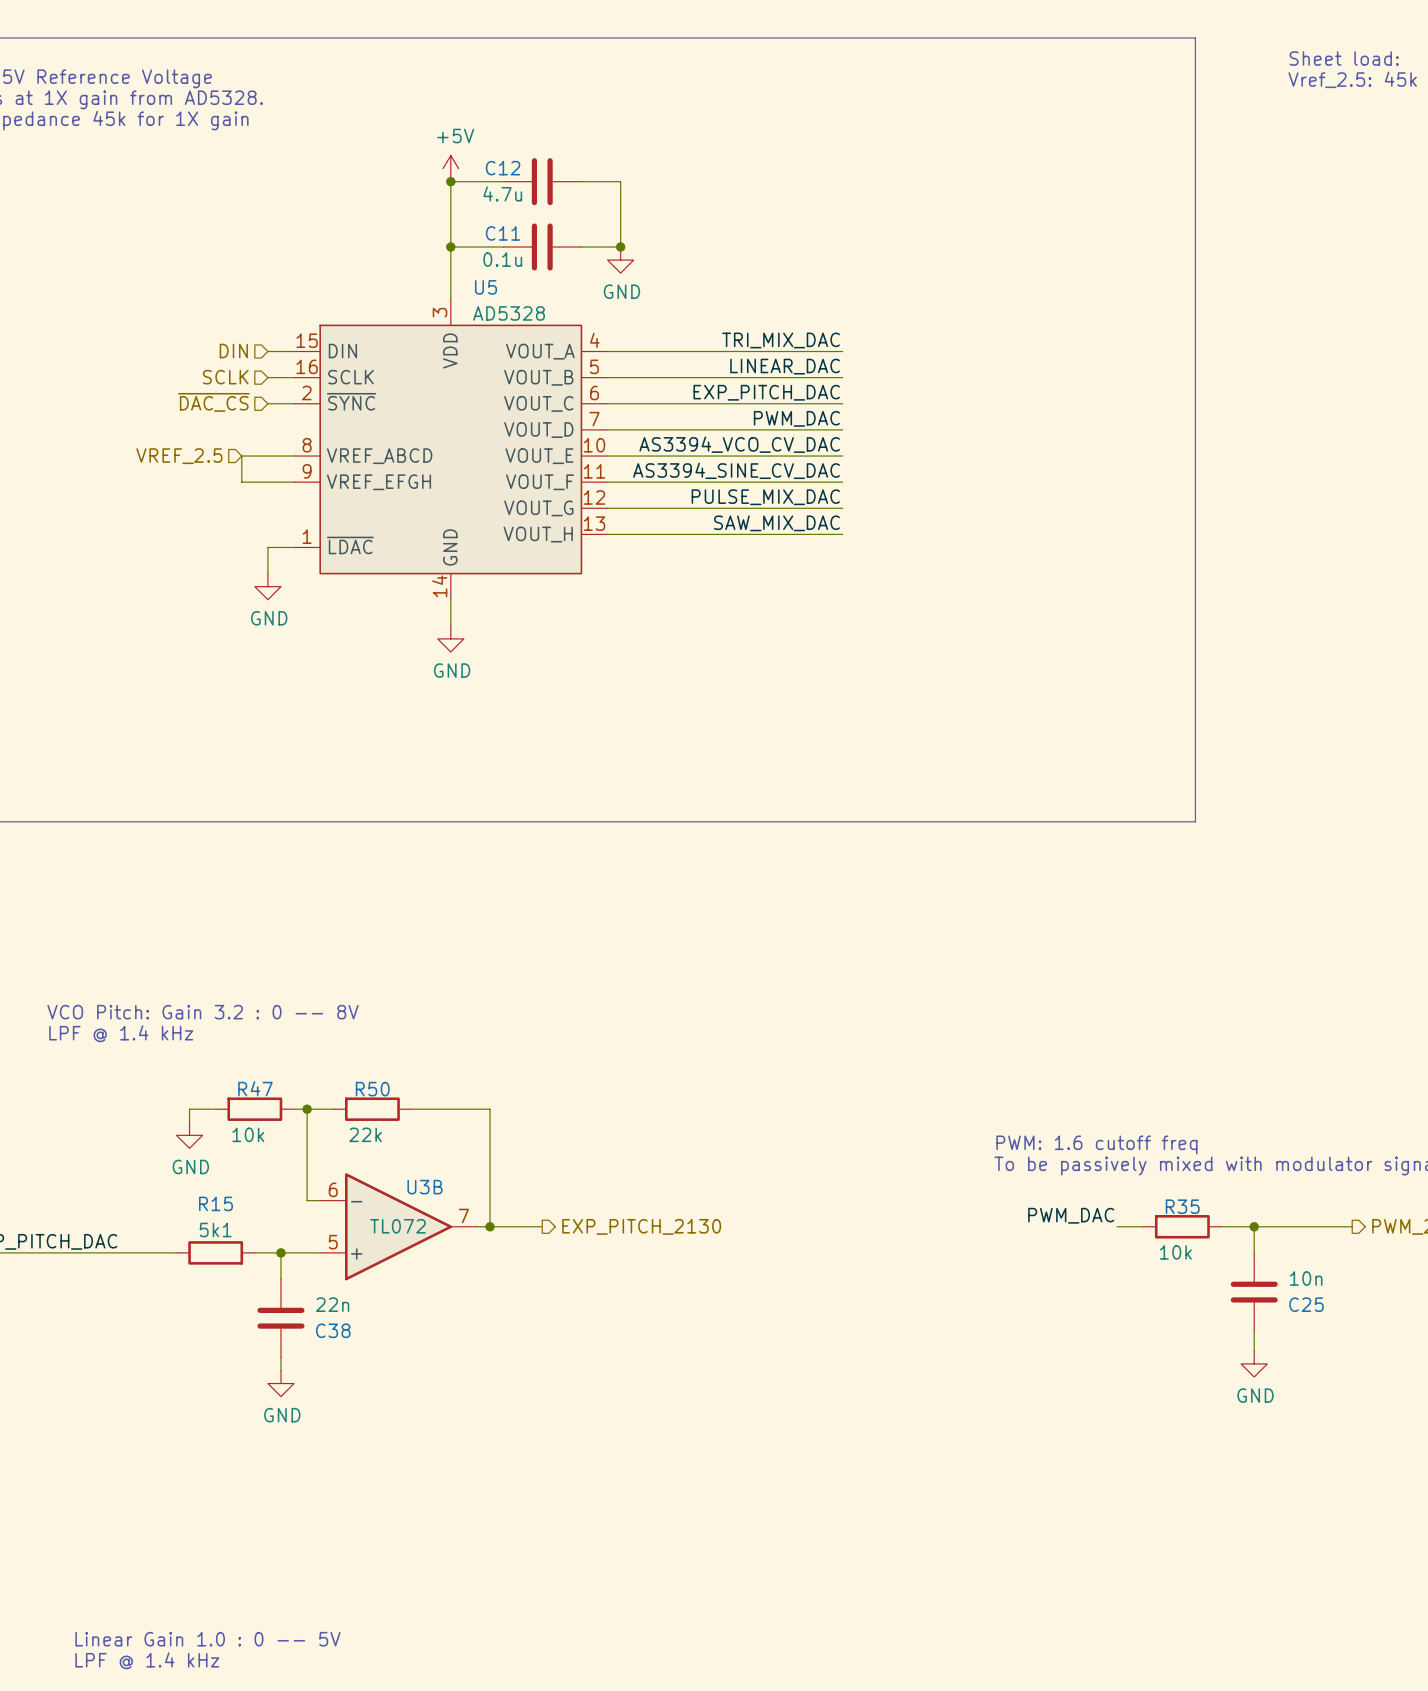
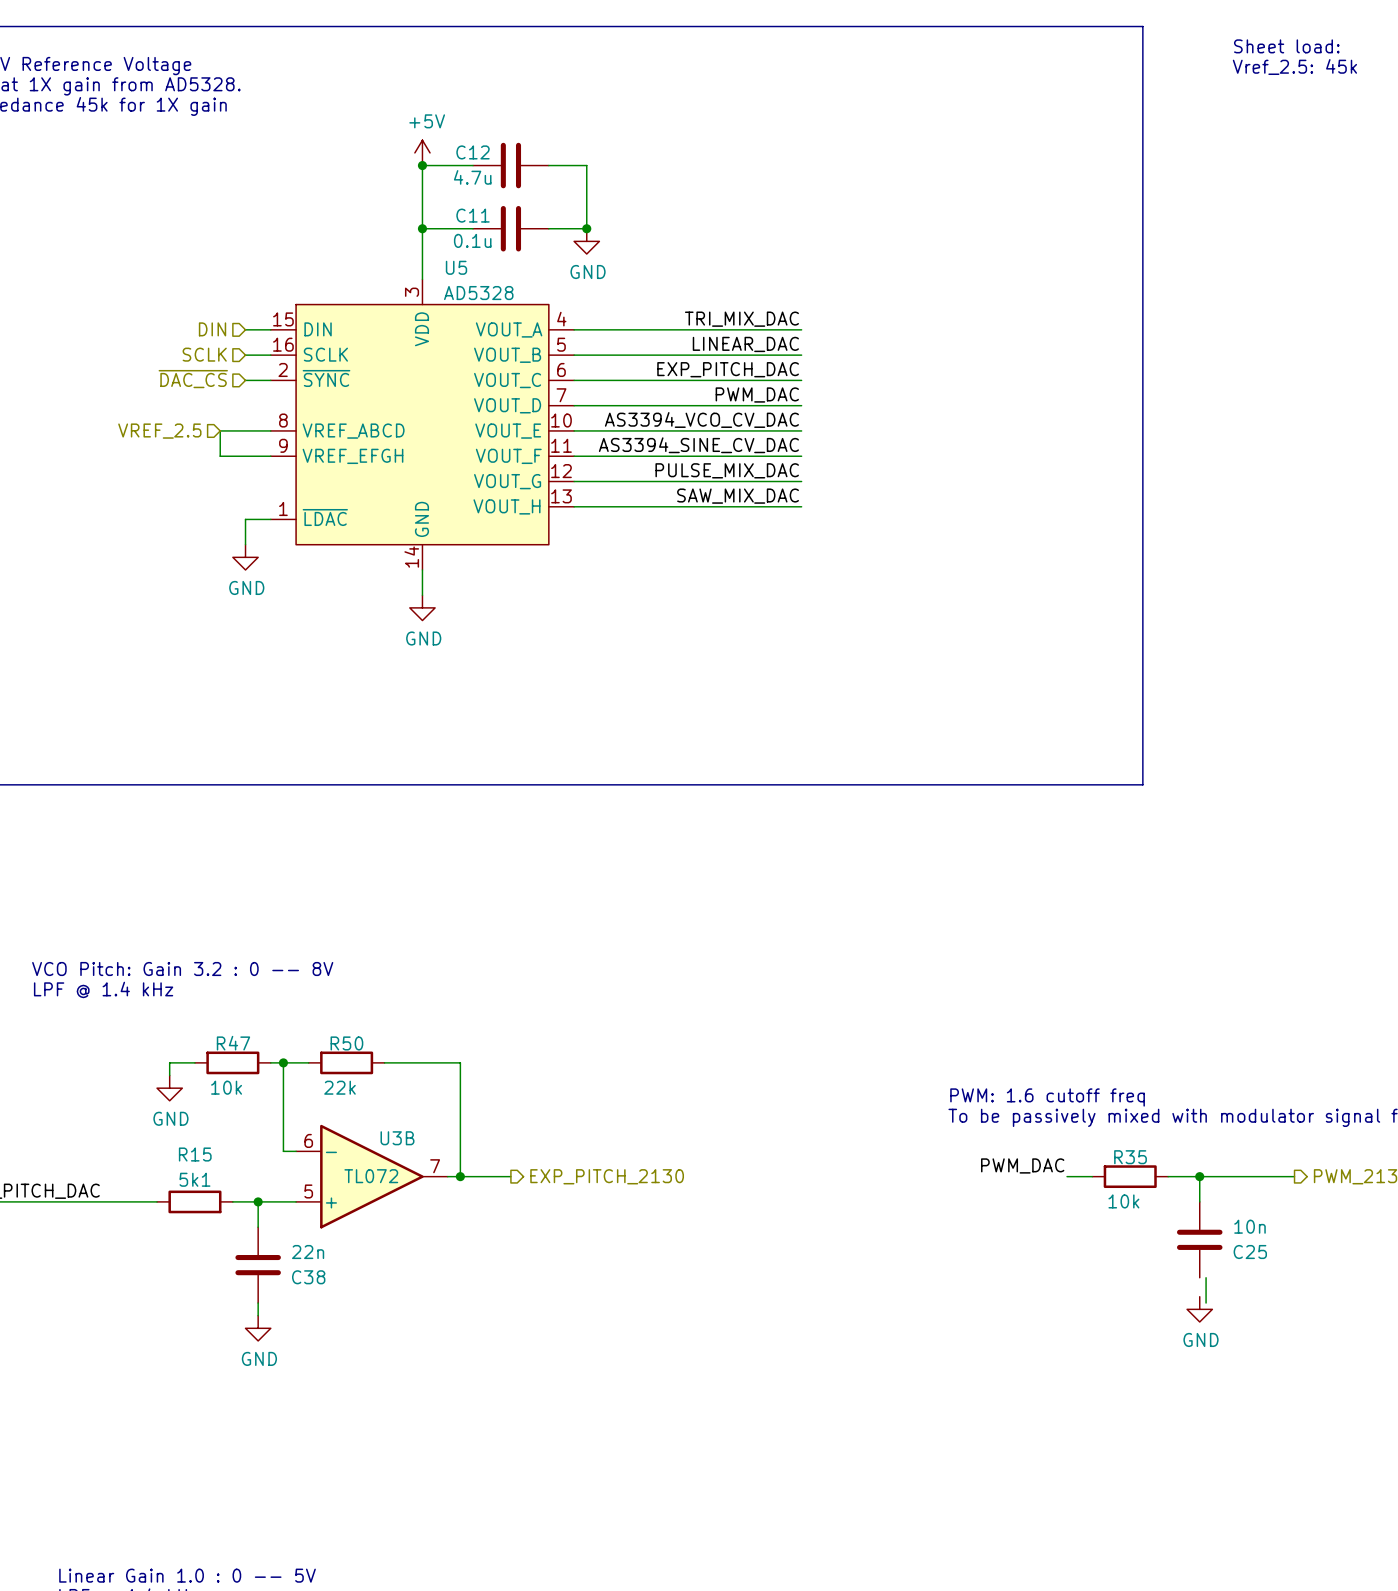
wire: (1254, 1331) (1254, 1350) -> none
wire: none -> (1206, 1277) (1206, 1303)

